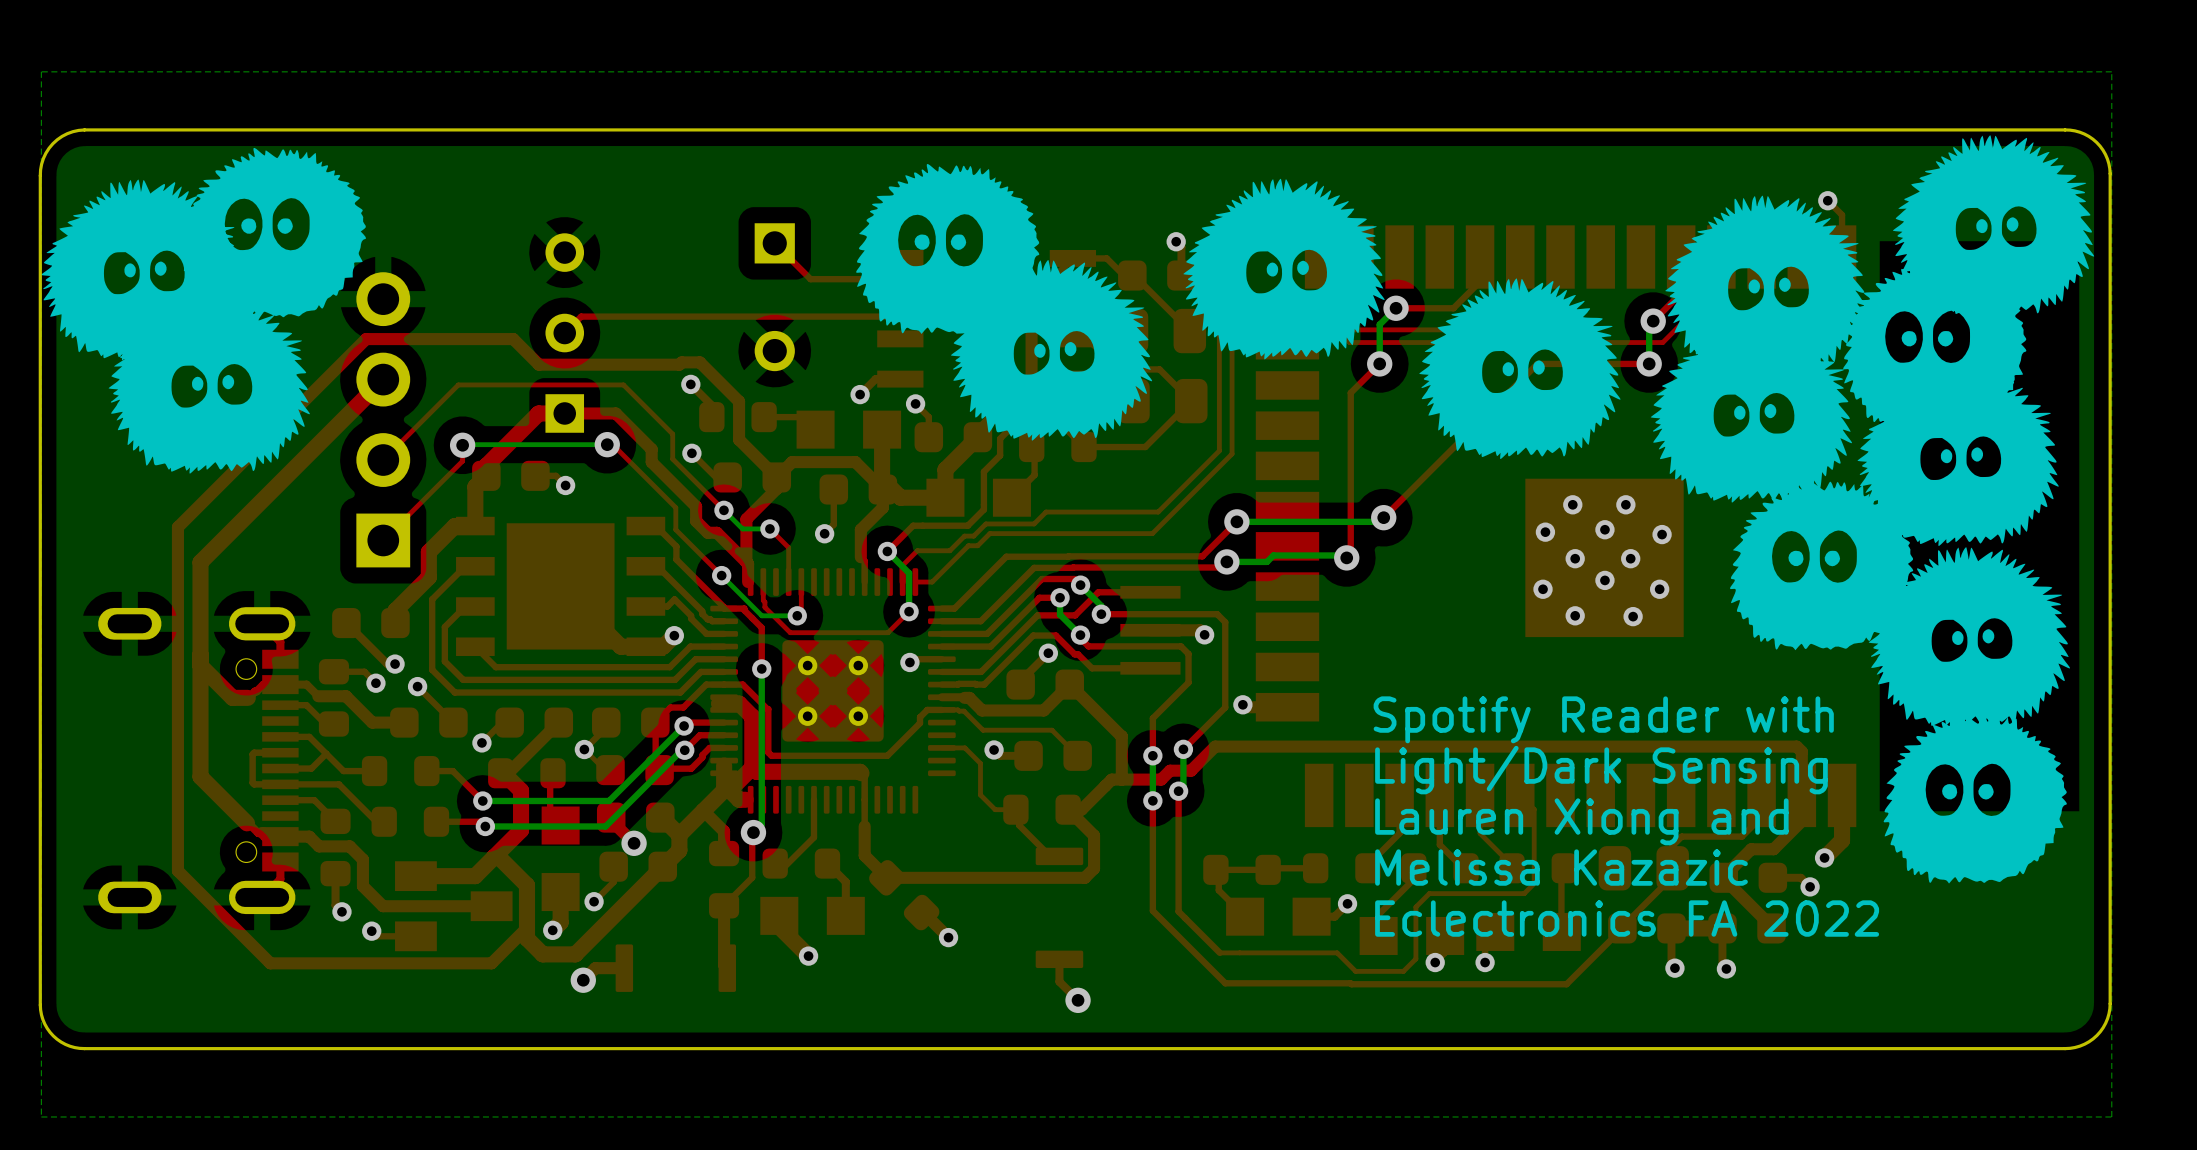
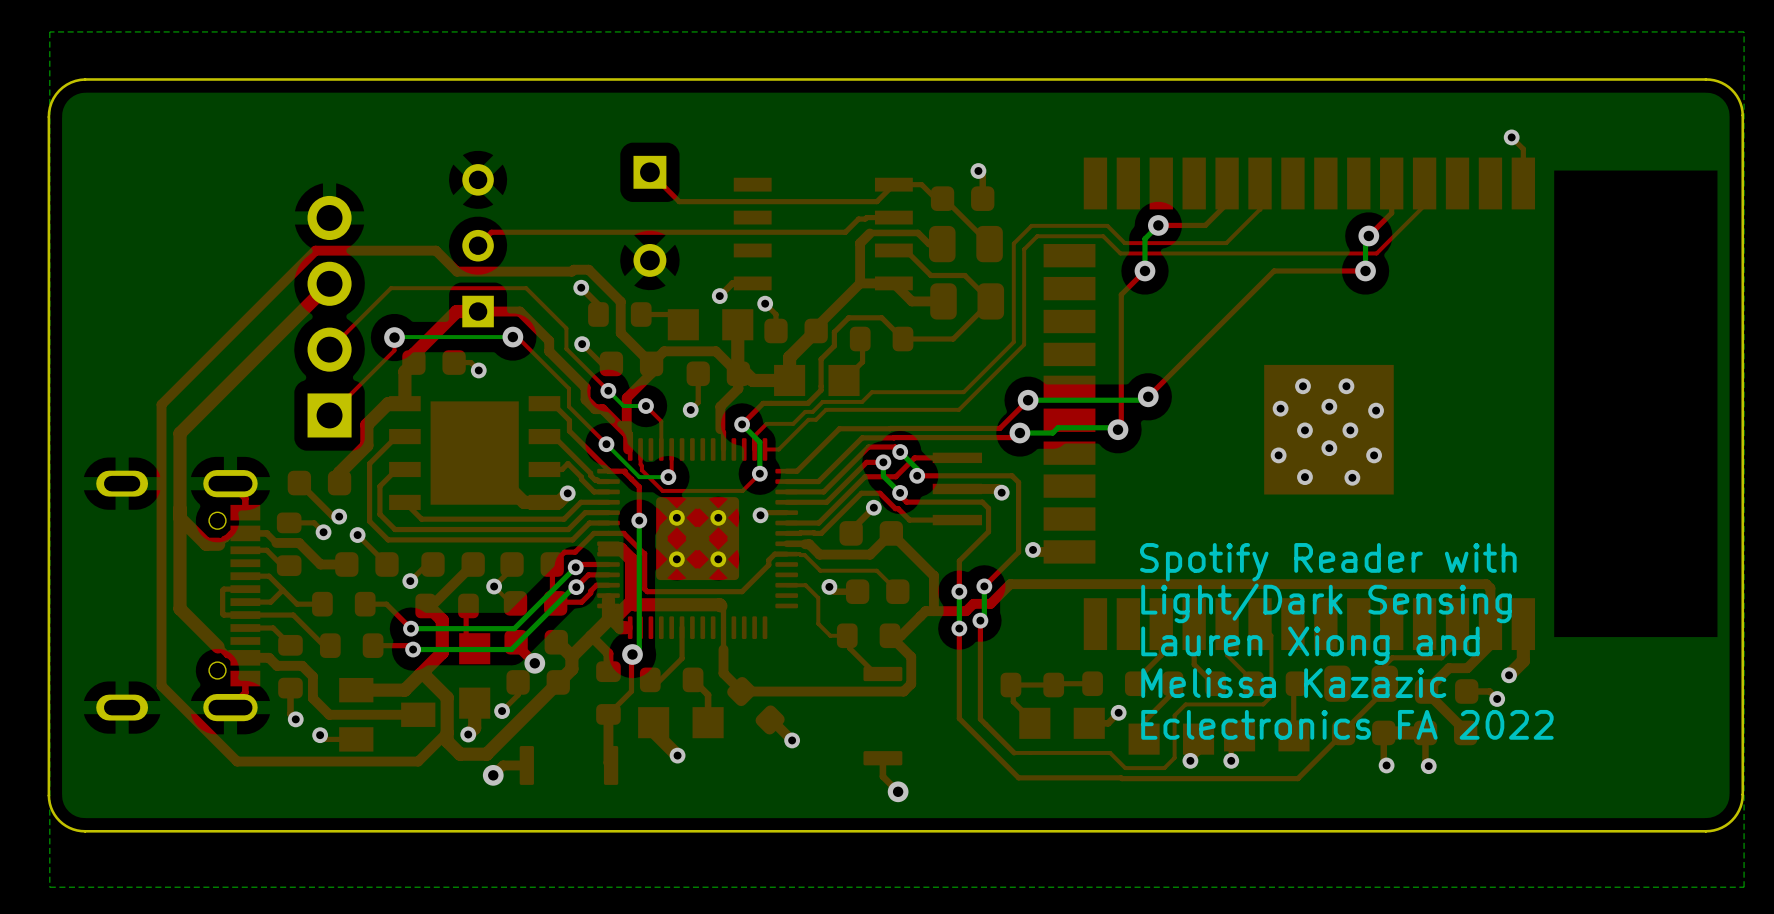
drawing: [856, 135, 2095, 884] -> none
drawing: [41, 147, 367, 474] -> none

